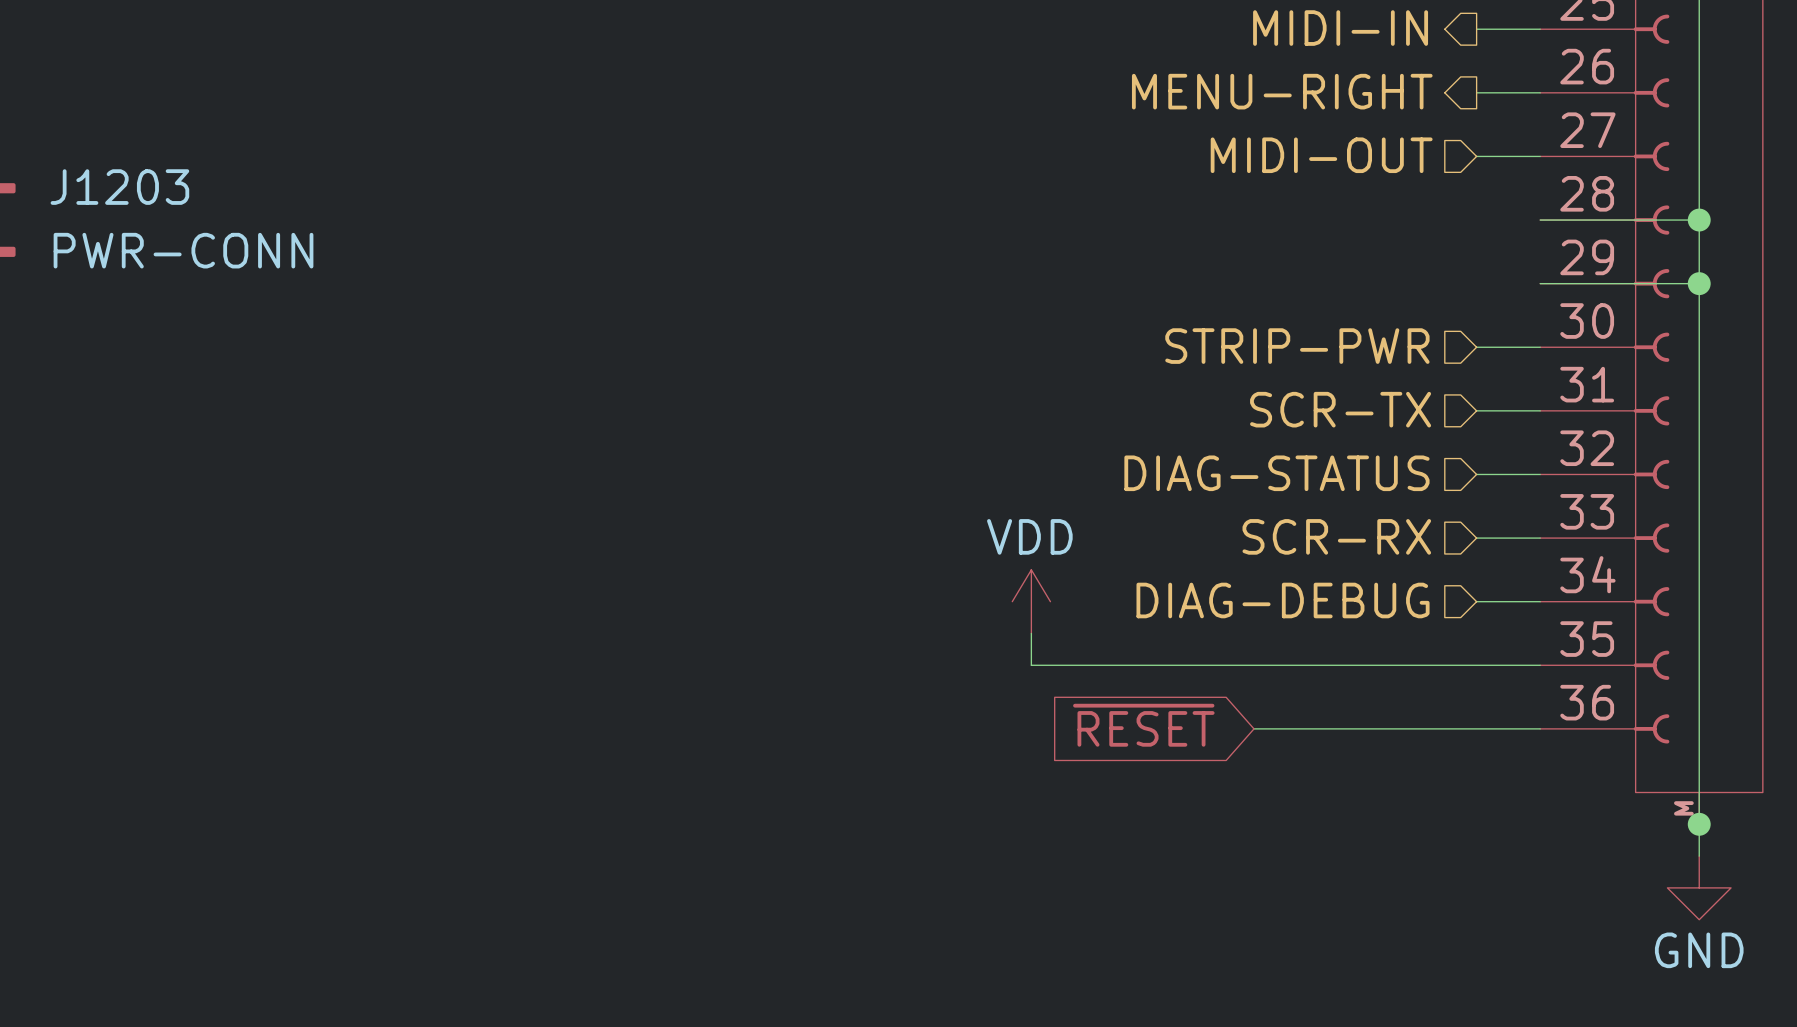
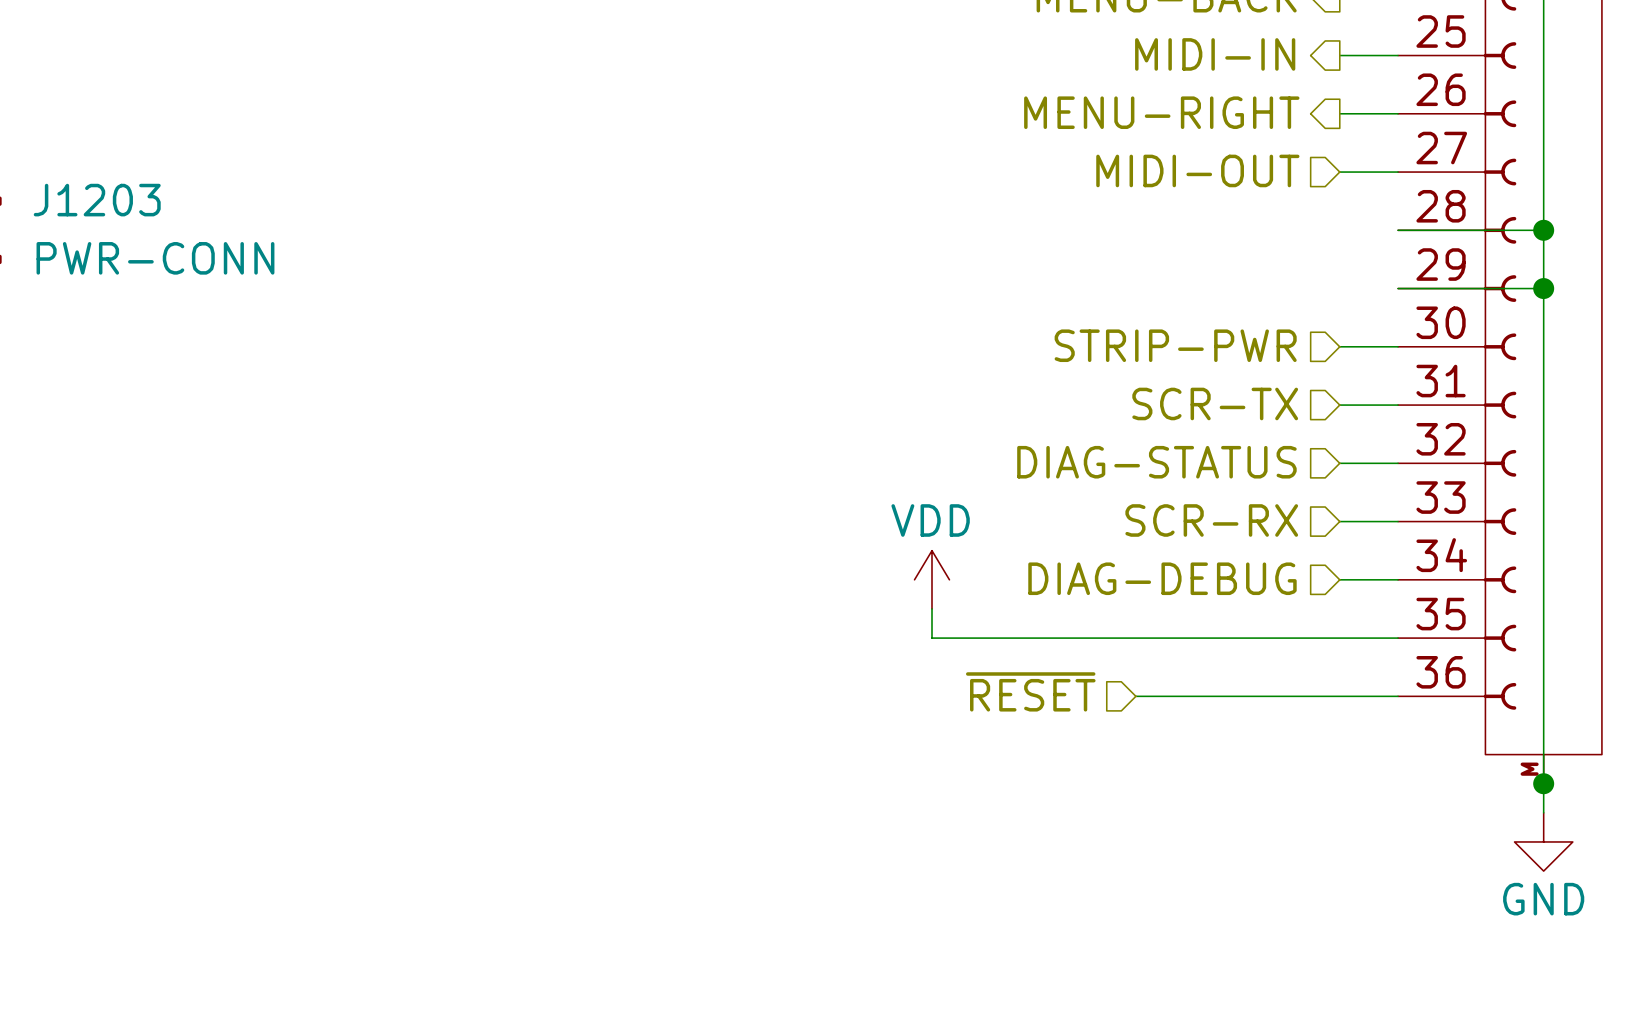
hierarchical label: none -> ~{RESET} (1030, 691)
global label: ~{RESET} (1143, 725) -> none

